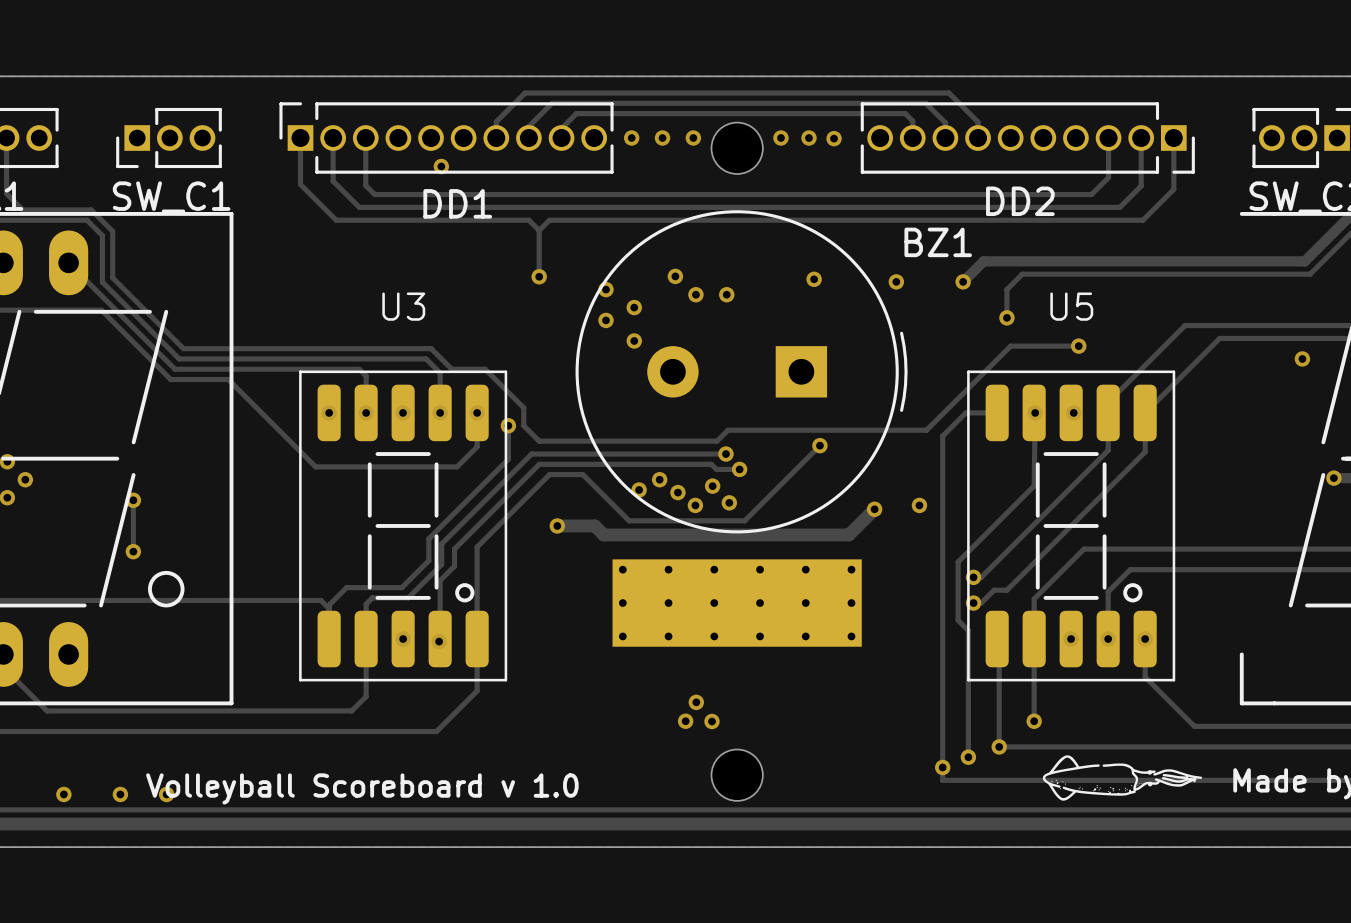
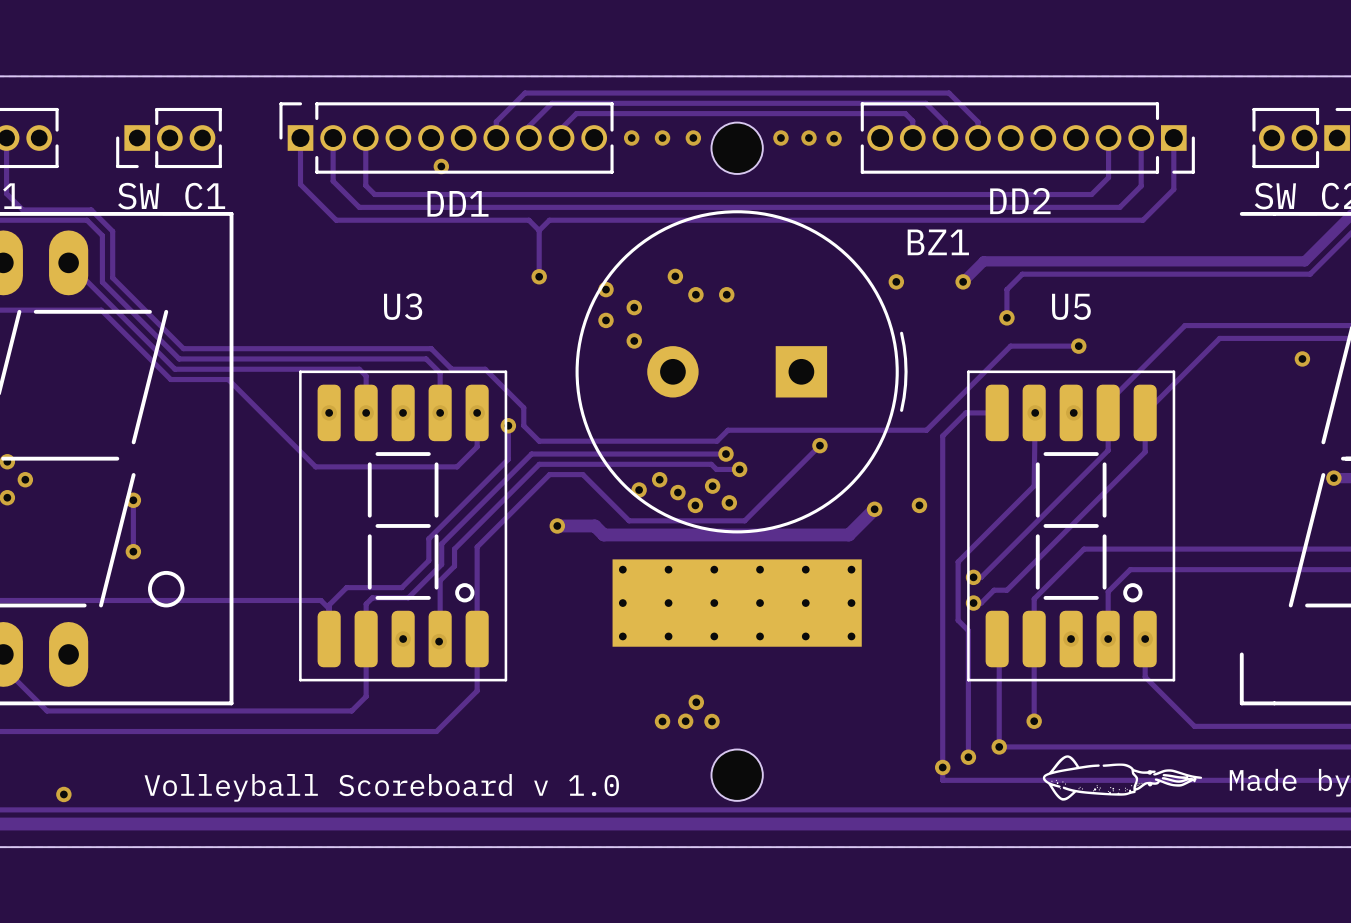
via: (814, 279) -> none
via: none -> (662, 721)
via: (120, 794) -> none
via: (166, 794) -> none

